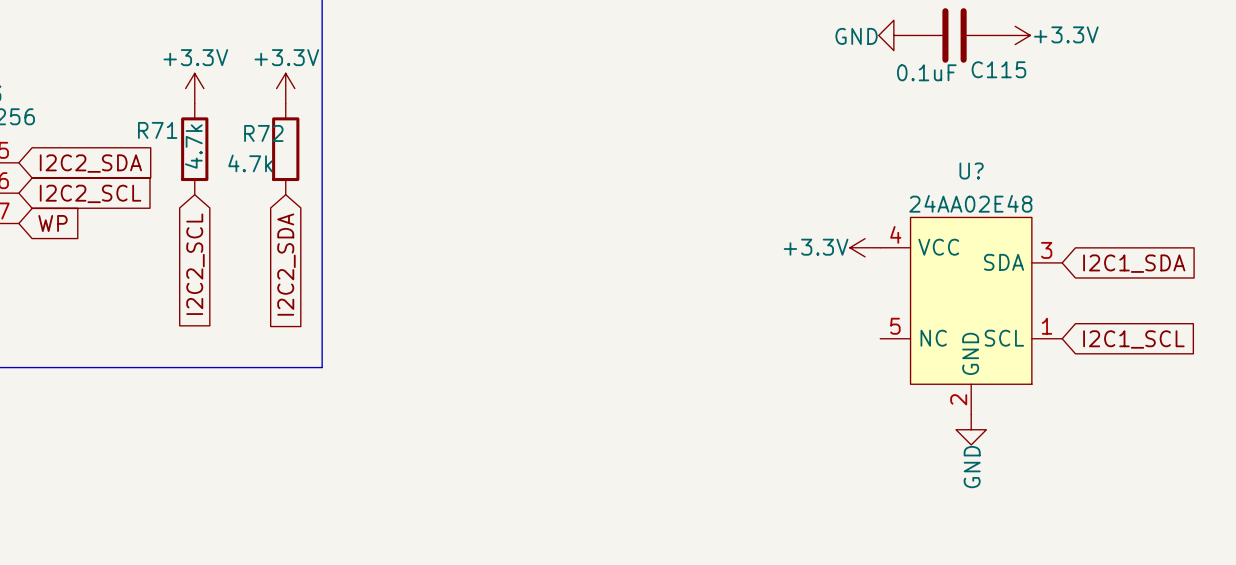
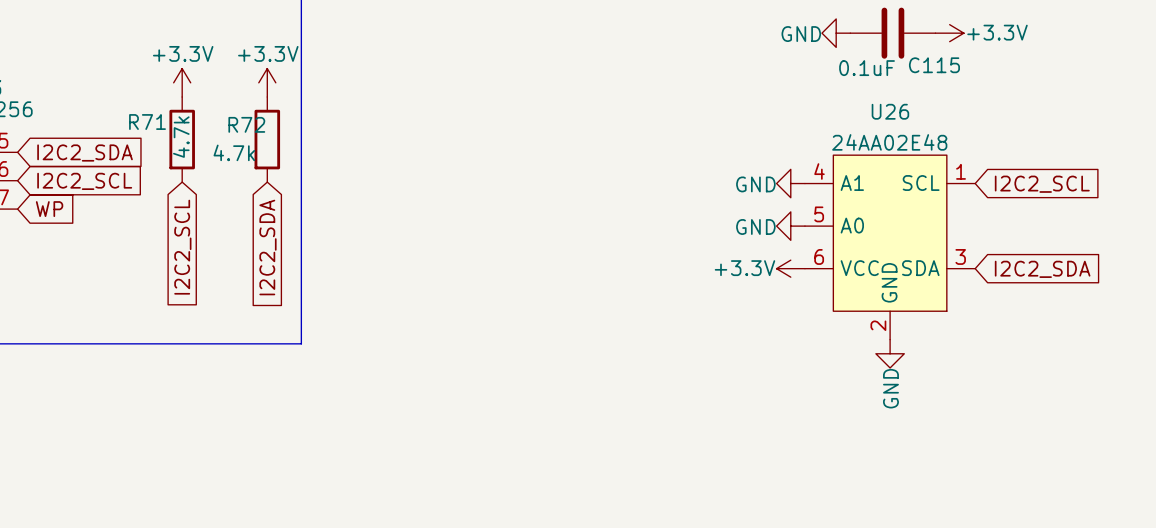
power symbol: none -> GND (790, 183)
global label: none -> I2C2_SCL (1042, 184)
power symbol: none -> GND (790, 226)
power symbol position: +3.3V (865, 247) -> +3.3V (790, 268)
global label: I2C1_SDA (1134, 263) -> I2C2_SDA (1042, 269)
U26: none -> 24AA02E48 (890, 247)
U?: 24AA02E48 (971, 316) -> none
global label: I2C1_SCL (1133, 339) -> none
power symbol position: GND (971, 429) -> GND (890, 353)

